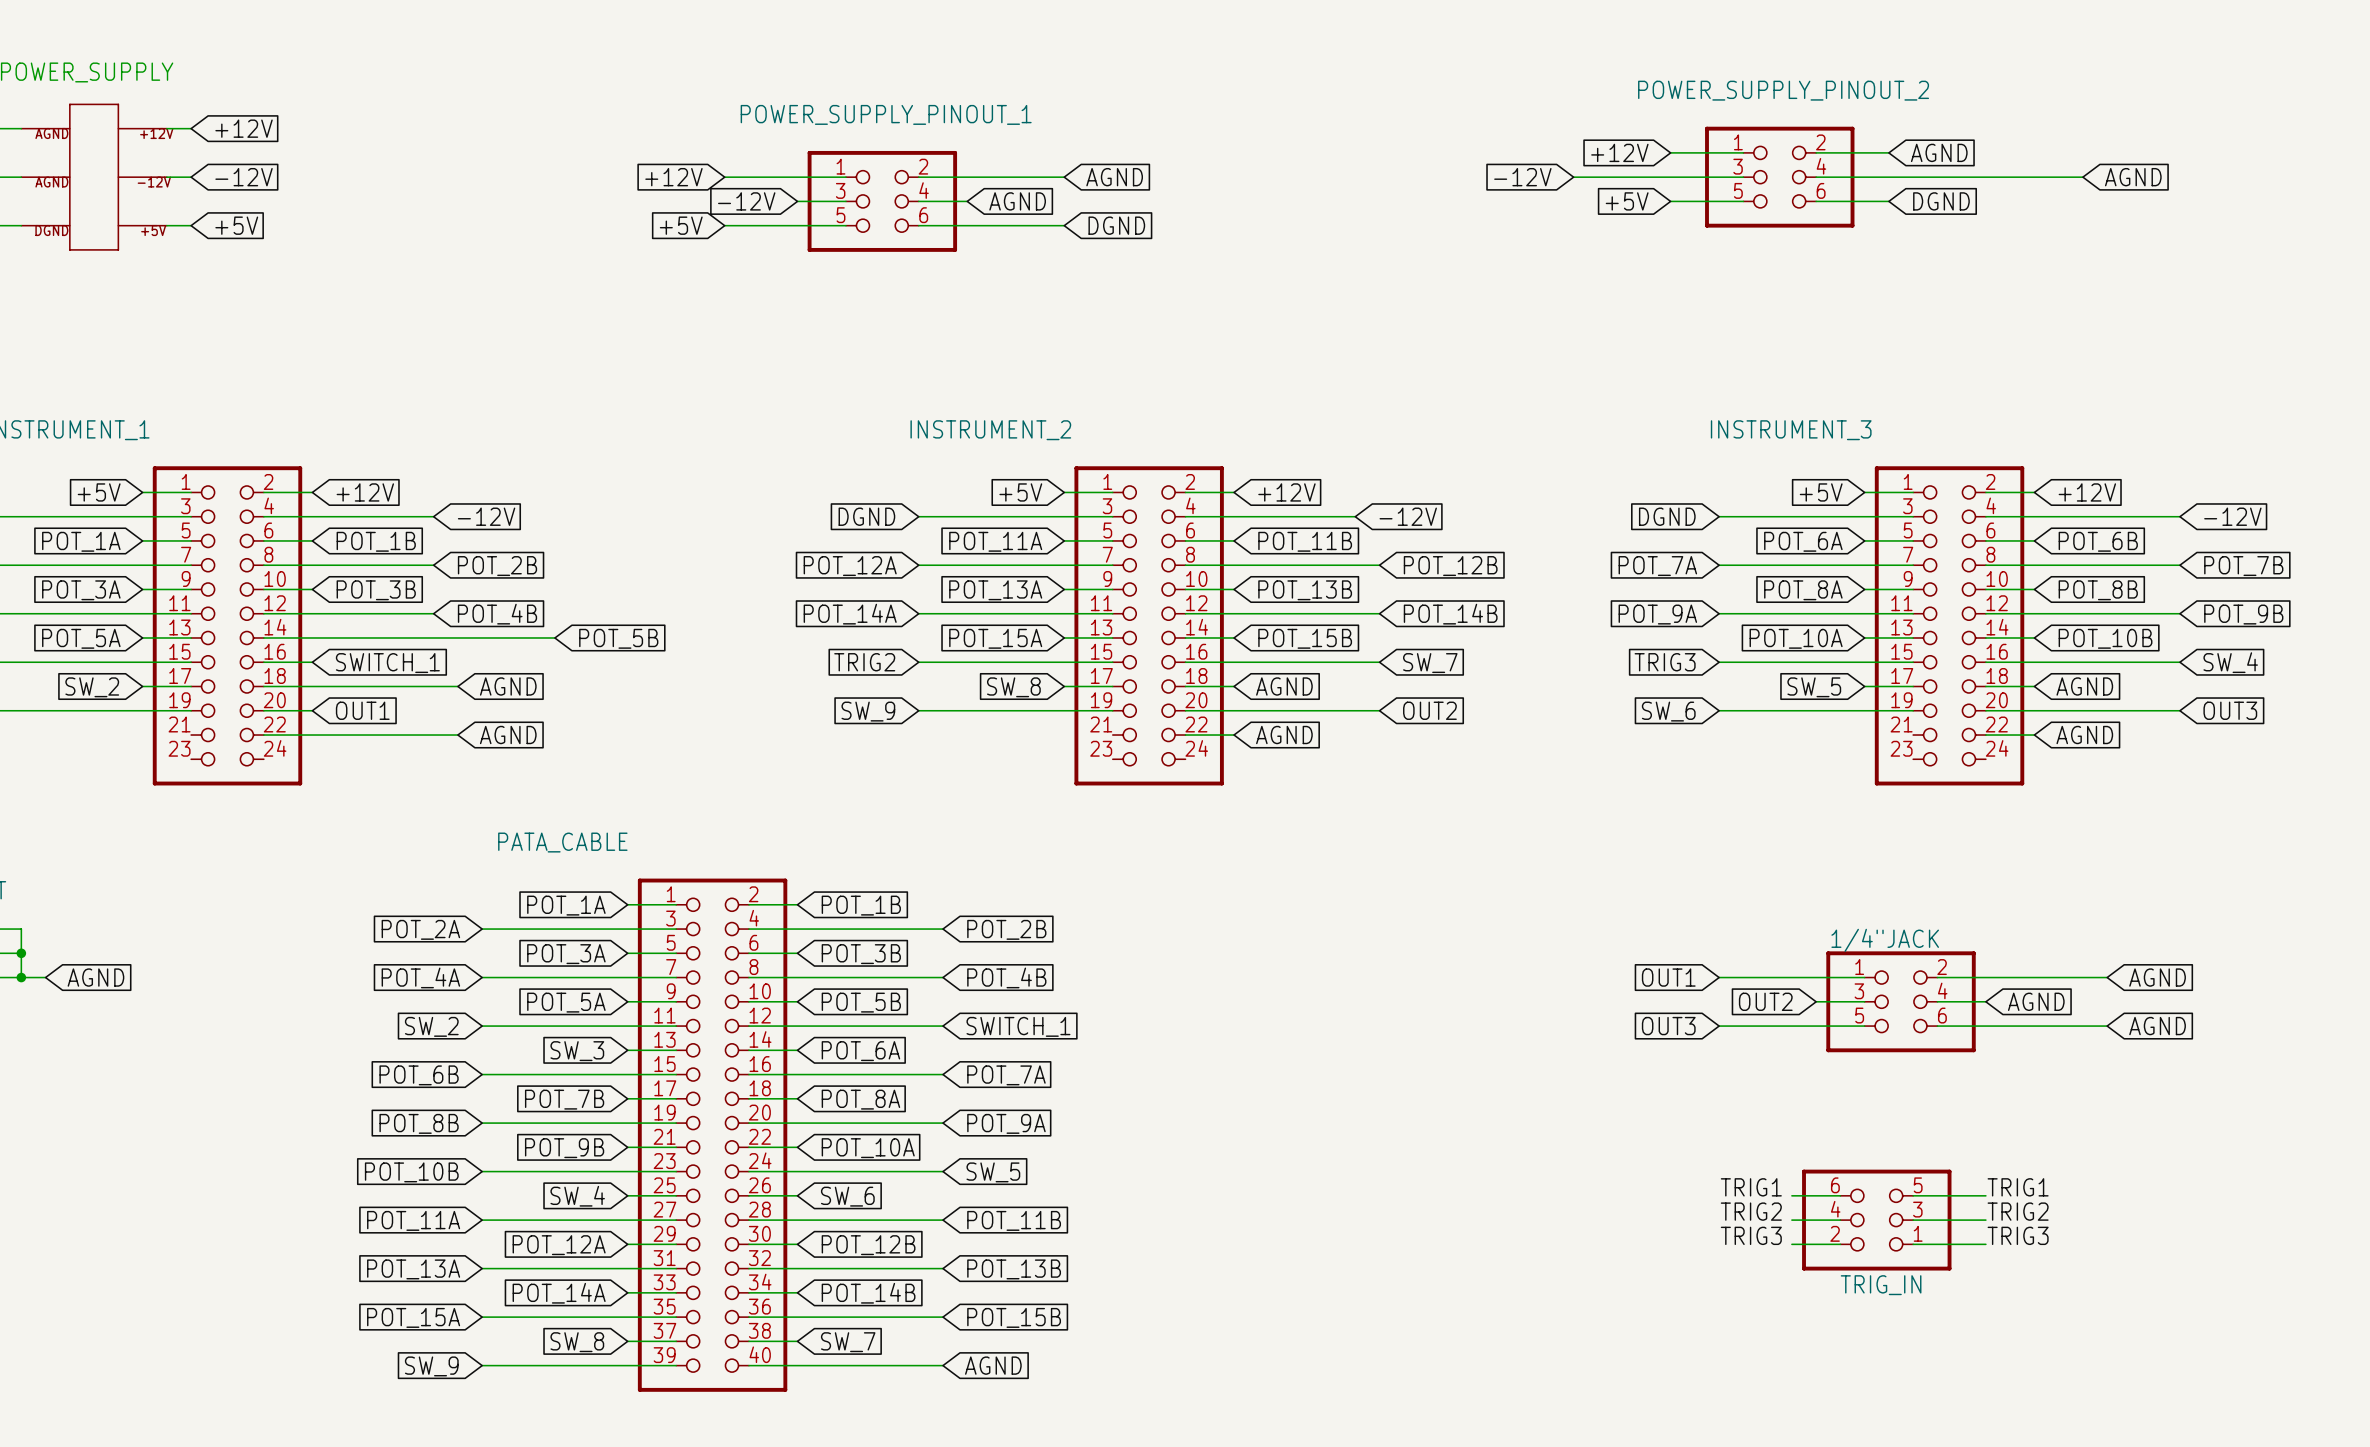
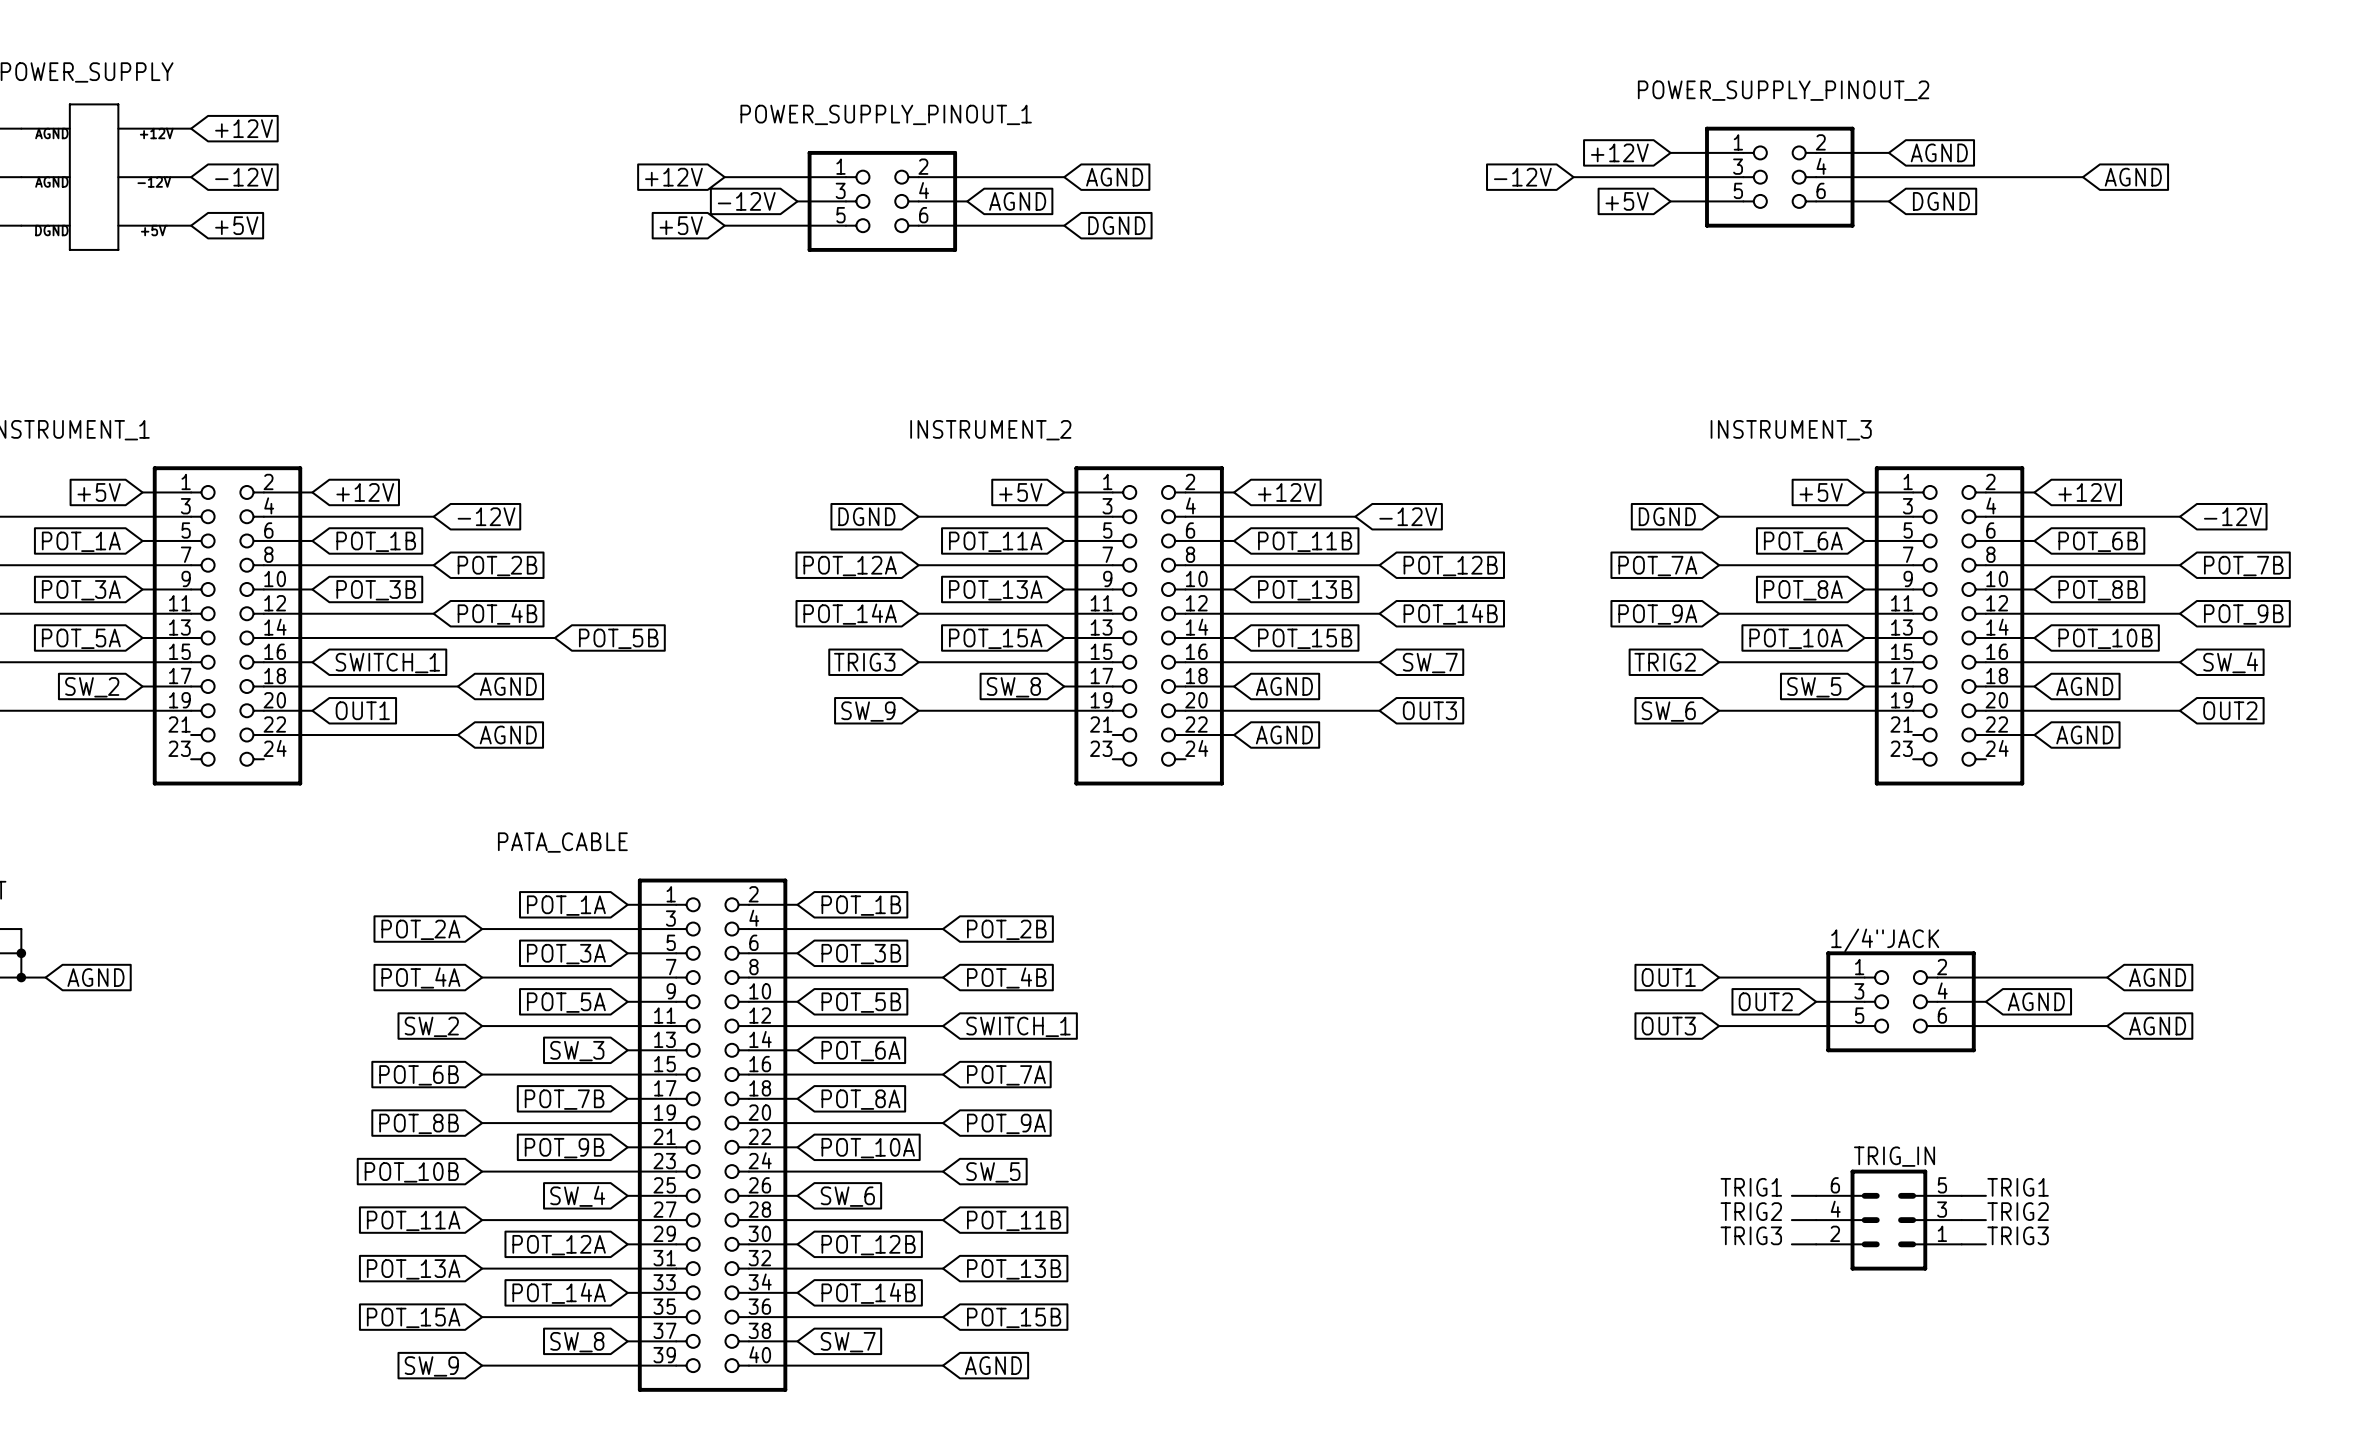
global label: TRIG2 (864, 662) -> TRIG3 (864, 662)
global label: TRIG3 (1665, 662) -> TRIG2 (1665, 662)
global label: OUT2 (1429, 710) -> OUT3 (1429, 710)
global label: OUT3 (2230, 710) -> OUT2 (2230, 710)
TRIG_IN: (1876, 1220) -> none
TRIG_IN: none -> (1888, 1220)

